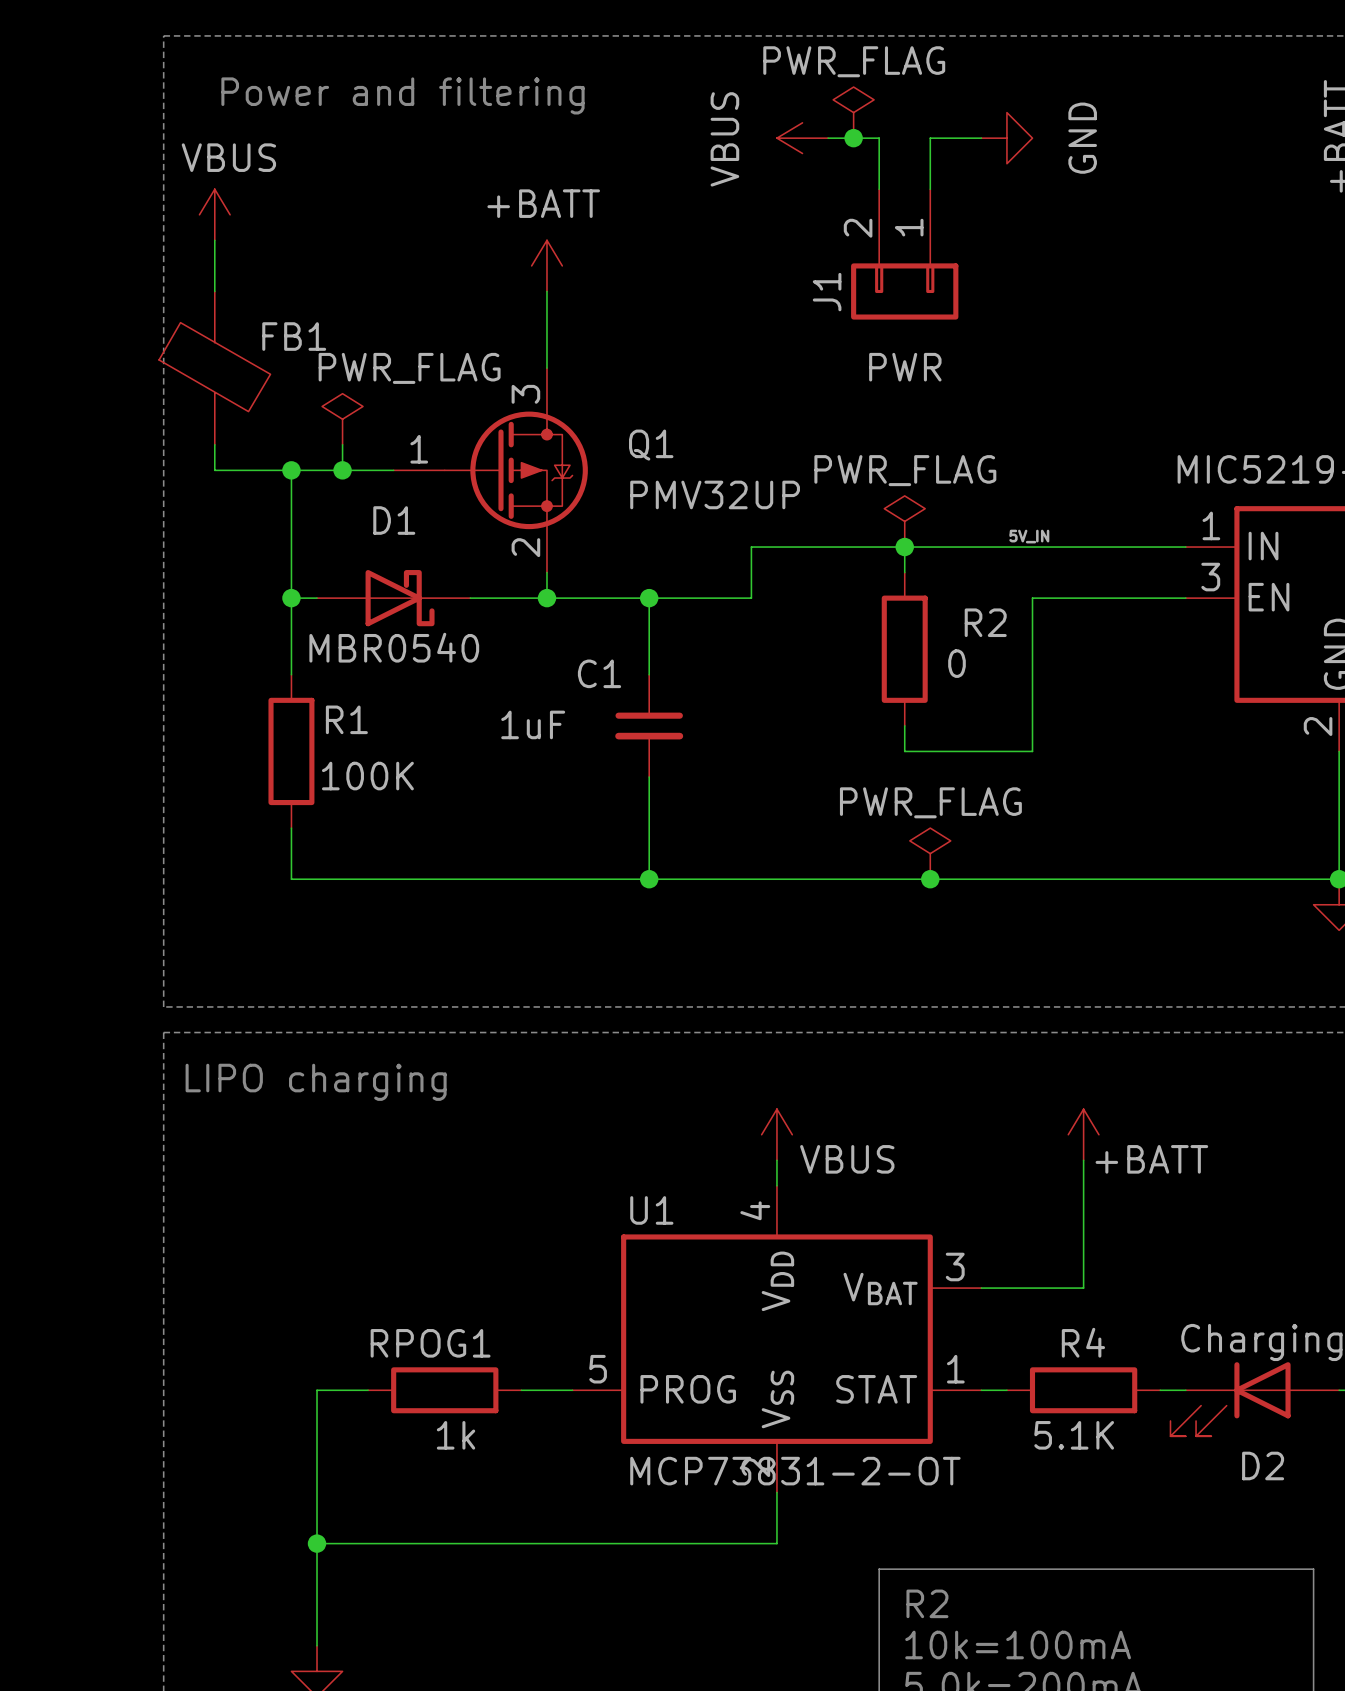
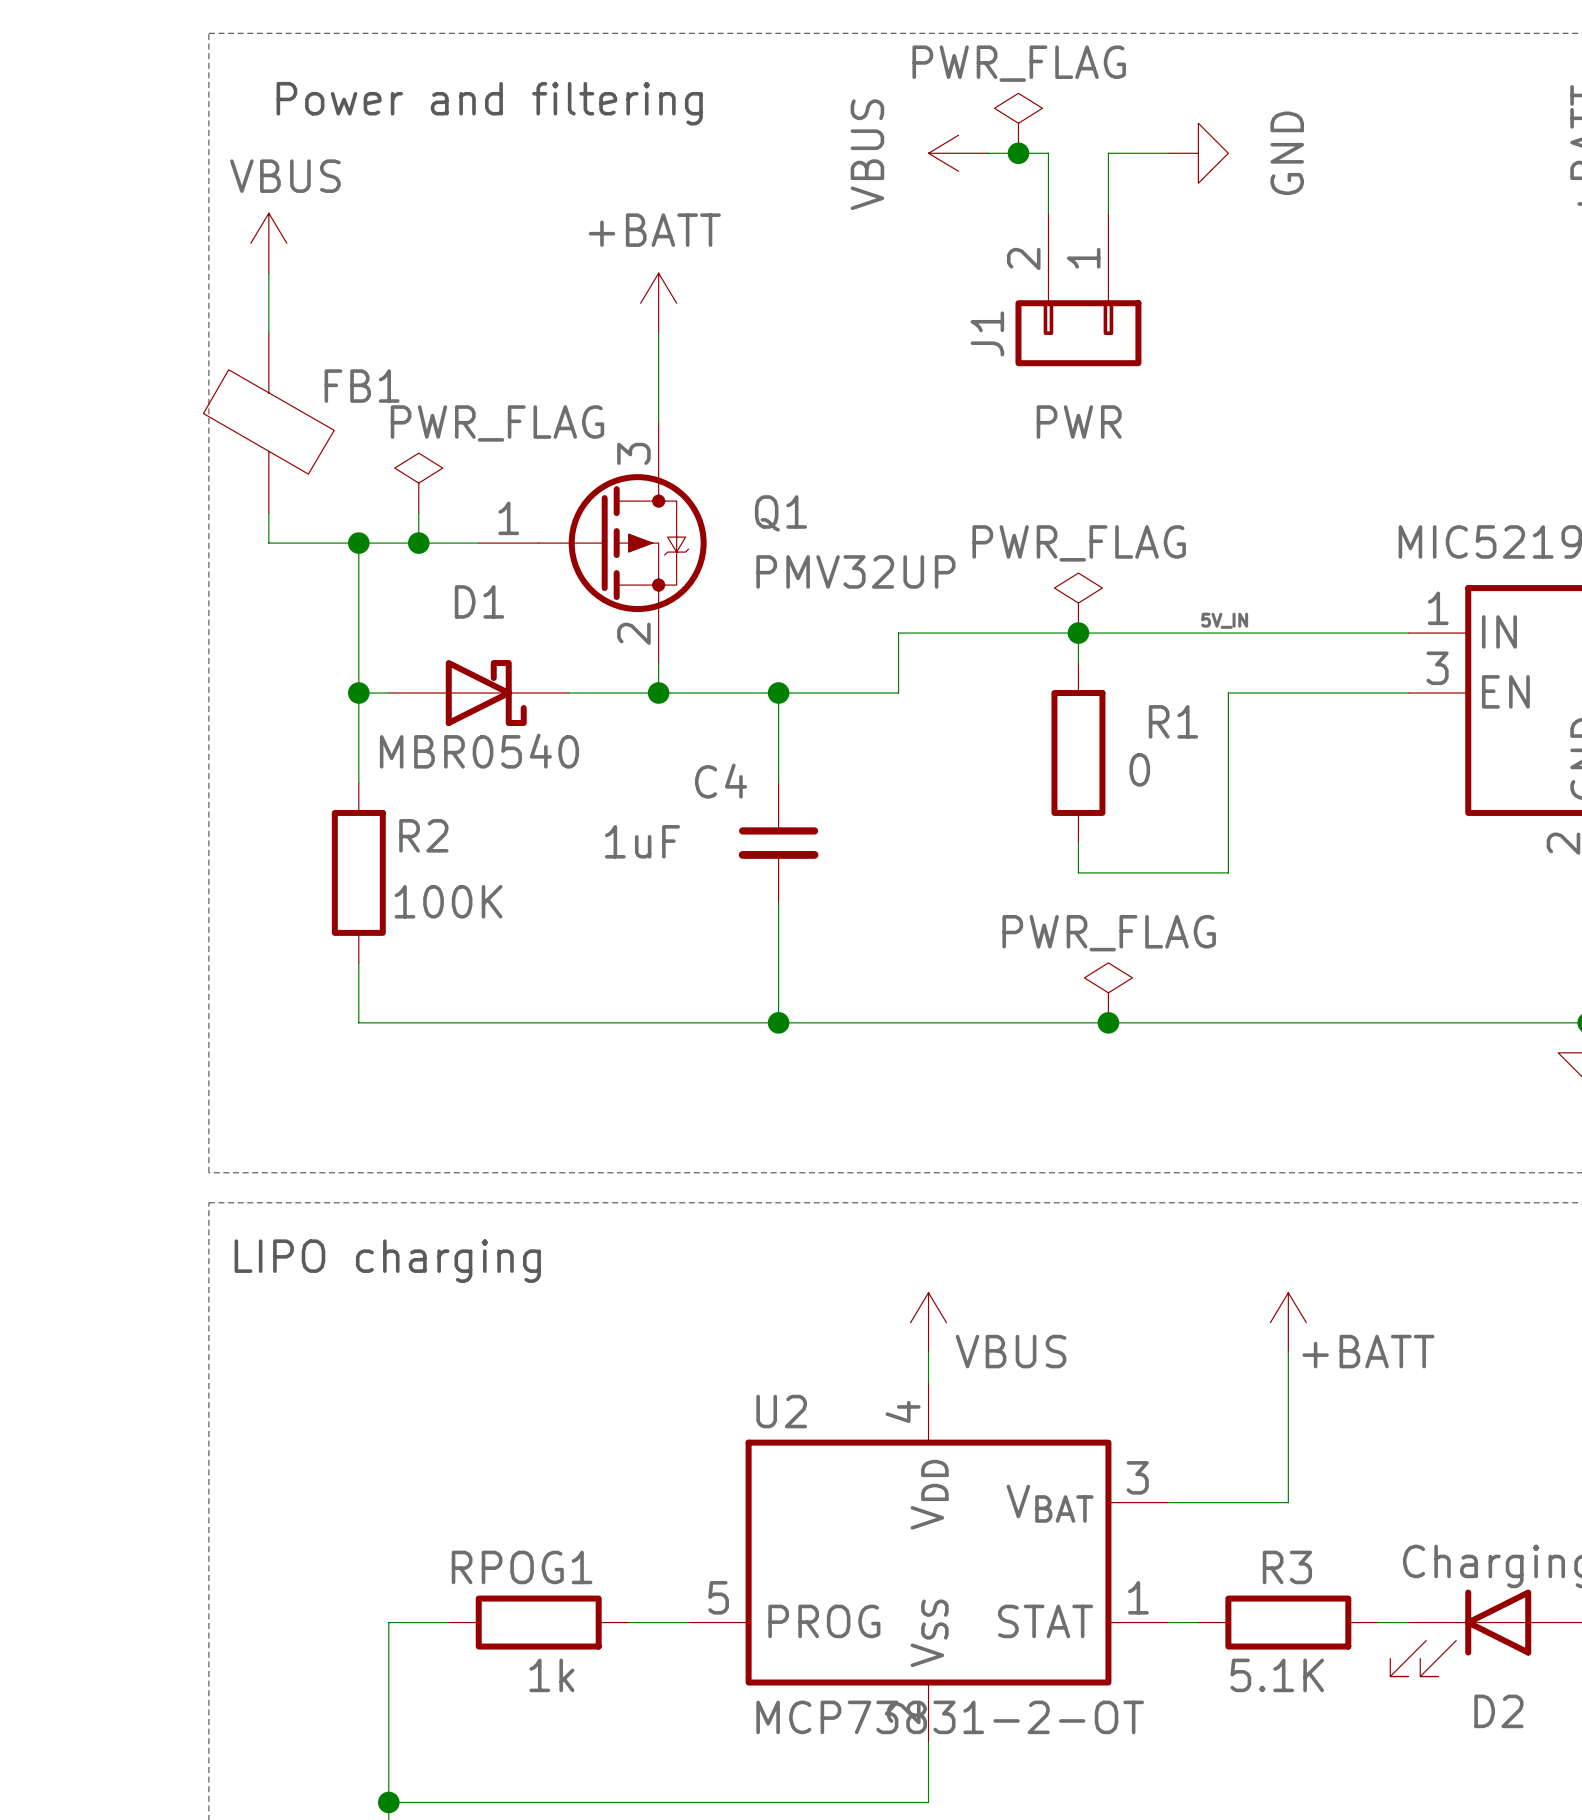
R2 name: R2 (985, 622) -> R1 (1173, 721)
C1 name: C1 (599, 673) -> C4 (720, 781)
R1 name: R1 (346, 719) -> R2 (423, 835)
U1 name: U1 (651, 1210) -> U2 (781, 1411)
R4 name: R4 (1083, 1342) -> R3 (1287, 1567)

